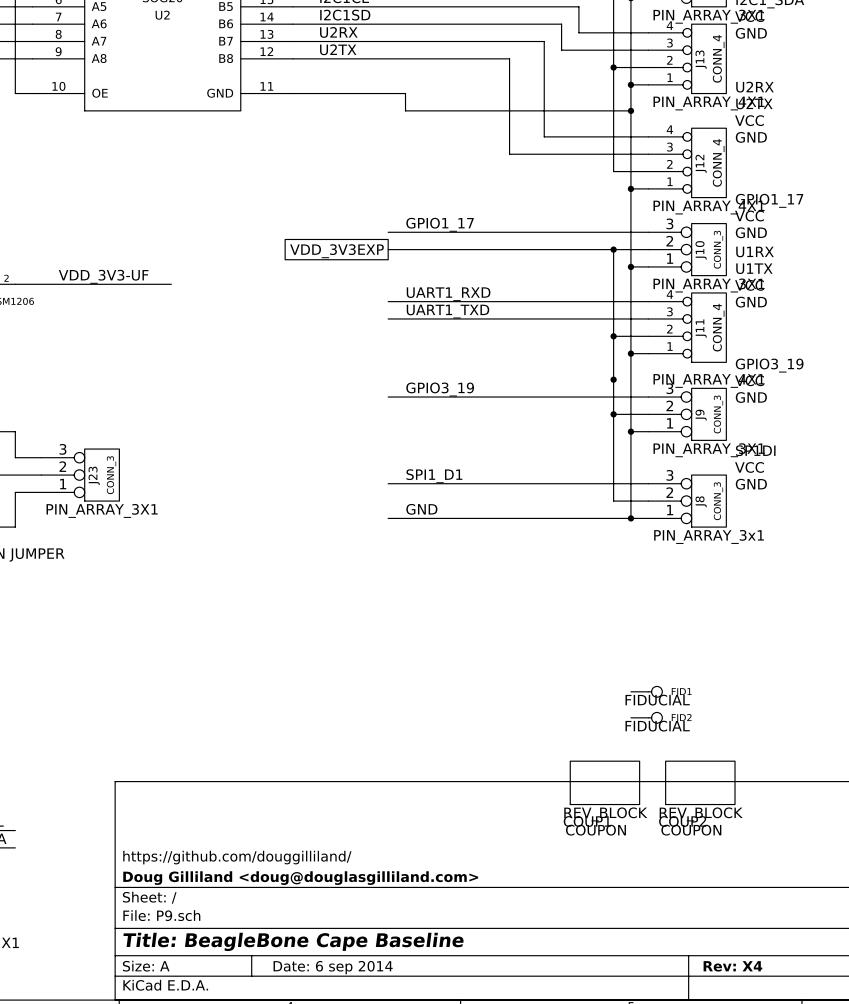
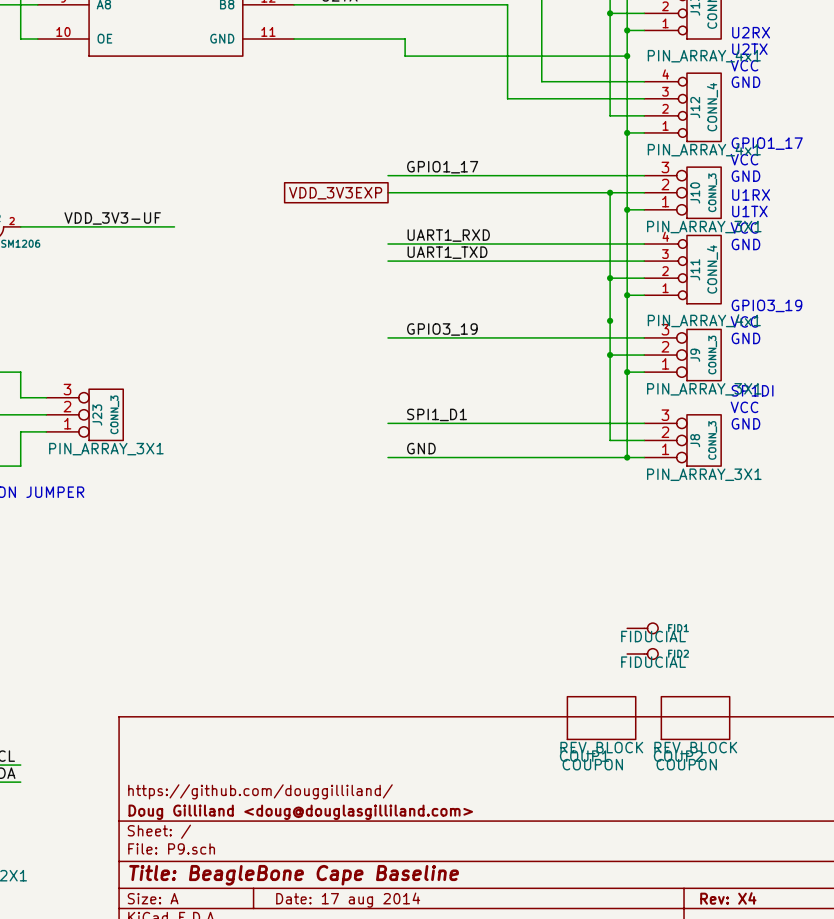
J13 text: PIN_ARRAY_4X1 (709, 103) -> PIN_ARRAY_4x1 (704, 55)
J12 text: PIN_ARRAY_4X1 (709, 207) -> PIN_ARRAY_4x1 (704, 149)
J11 text: PIN_ARRAY_4X1 (709, 380) -> PIN_ARRAY_4x1 (704, 320)
J8 text: PIN_ARRAY_3x1 (709, 536) -> PIN_ARRAY_3X1 (704, 474)
title block: Date: 6 sep 2014 (333, 967) -> Date: 17 aug 2014 (348, 900)

